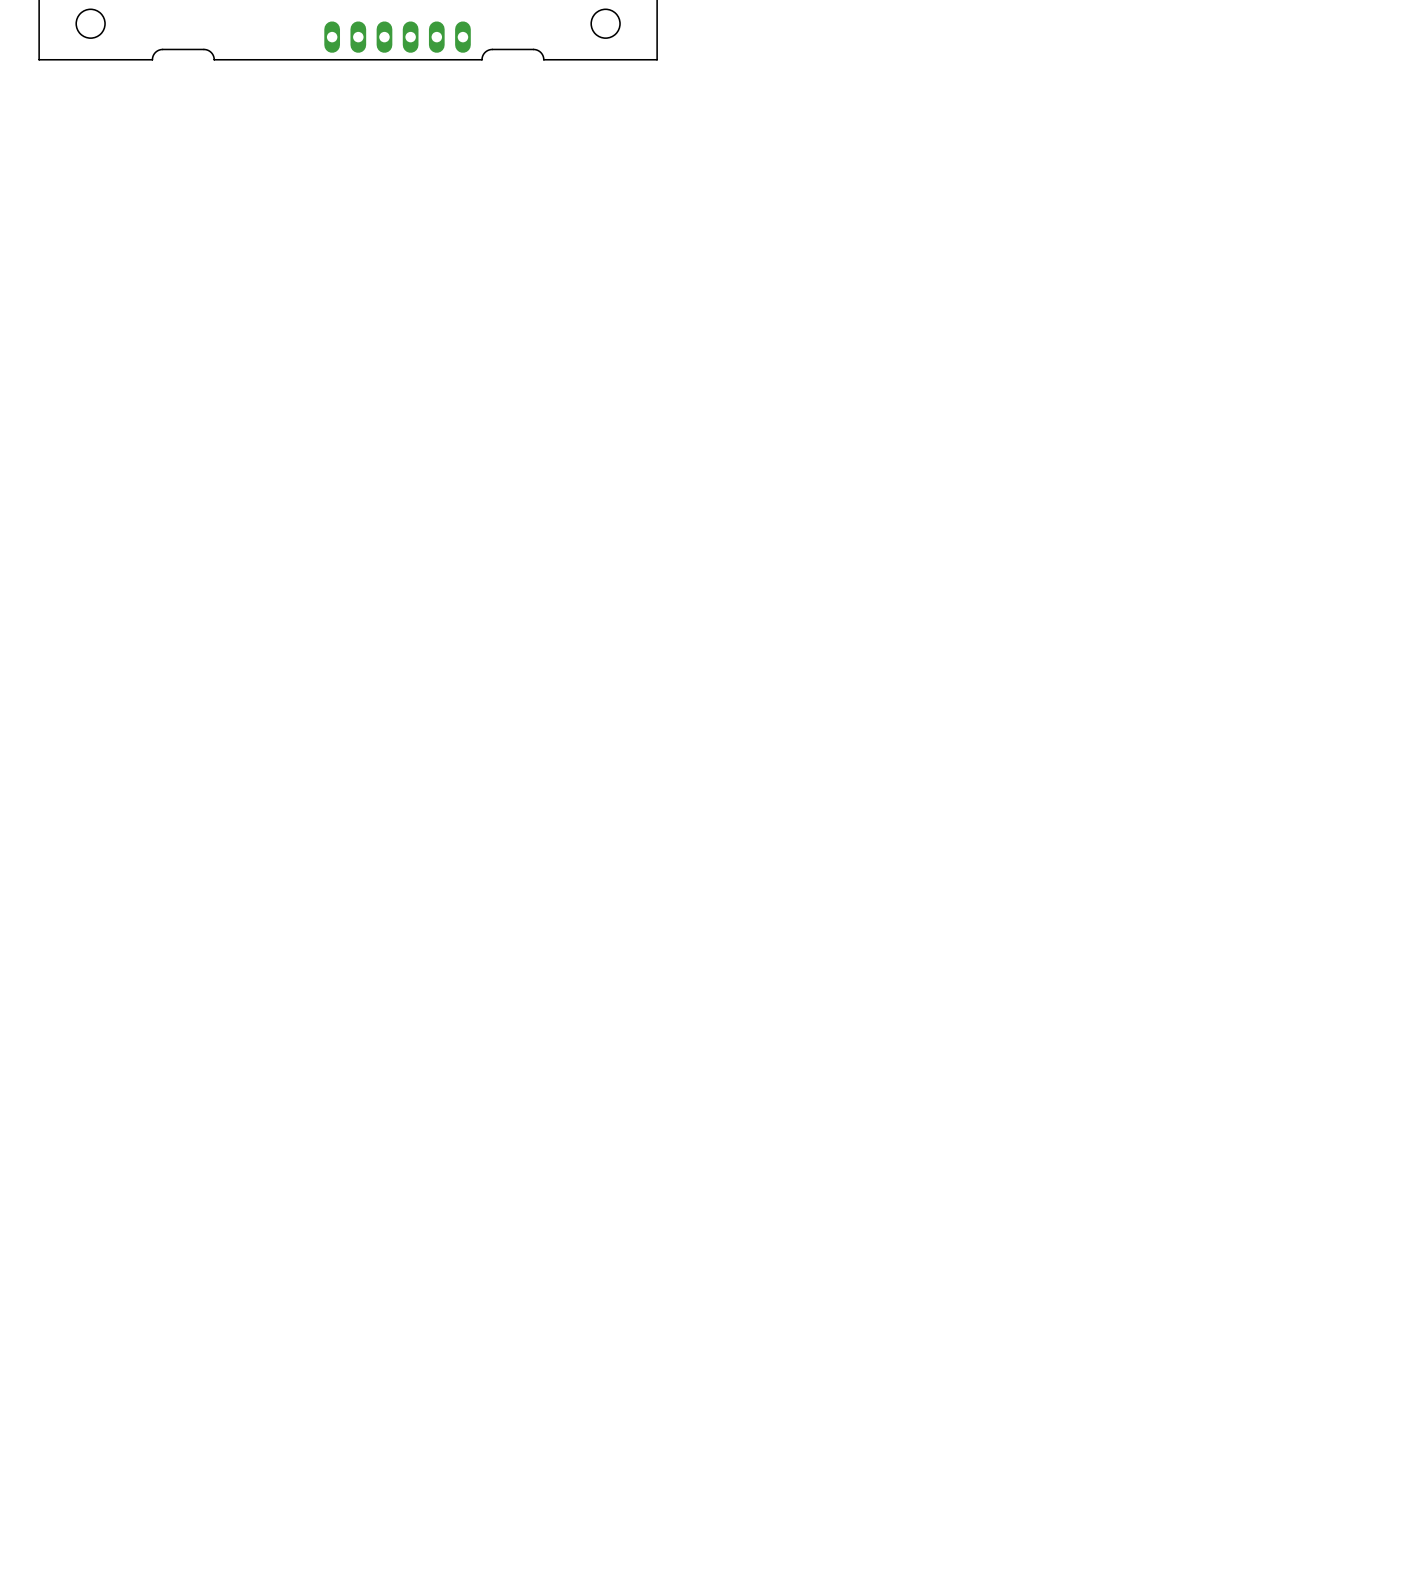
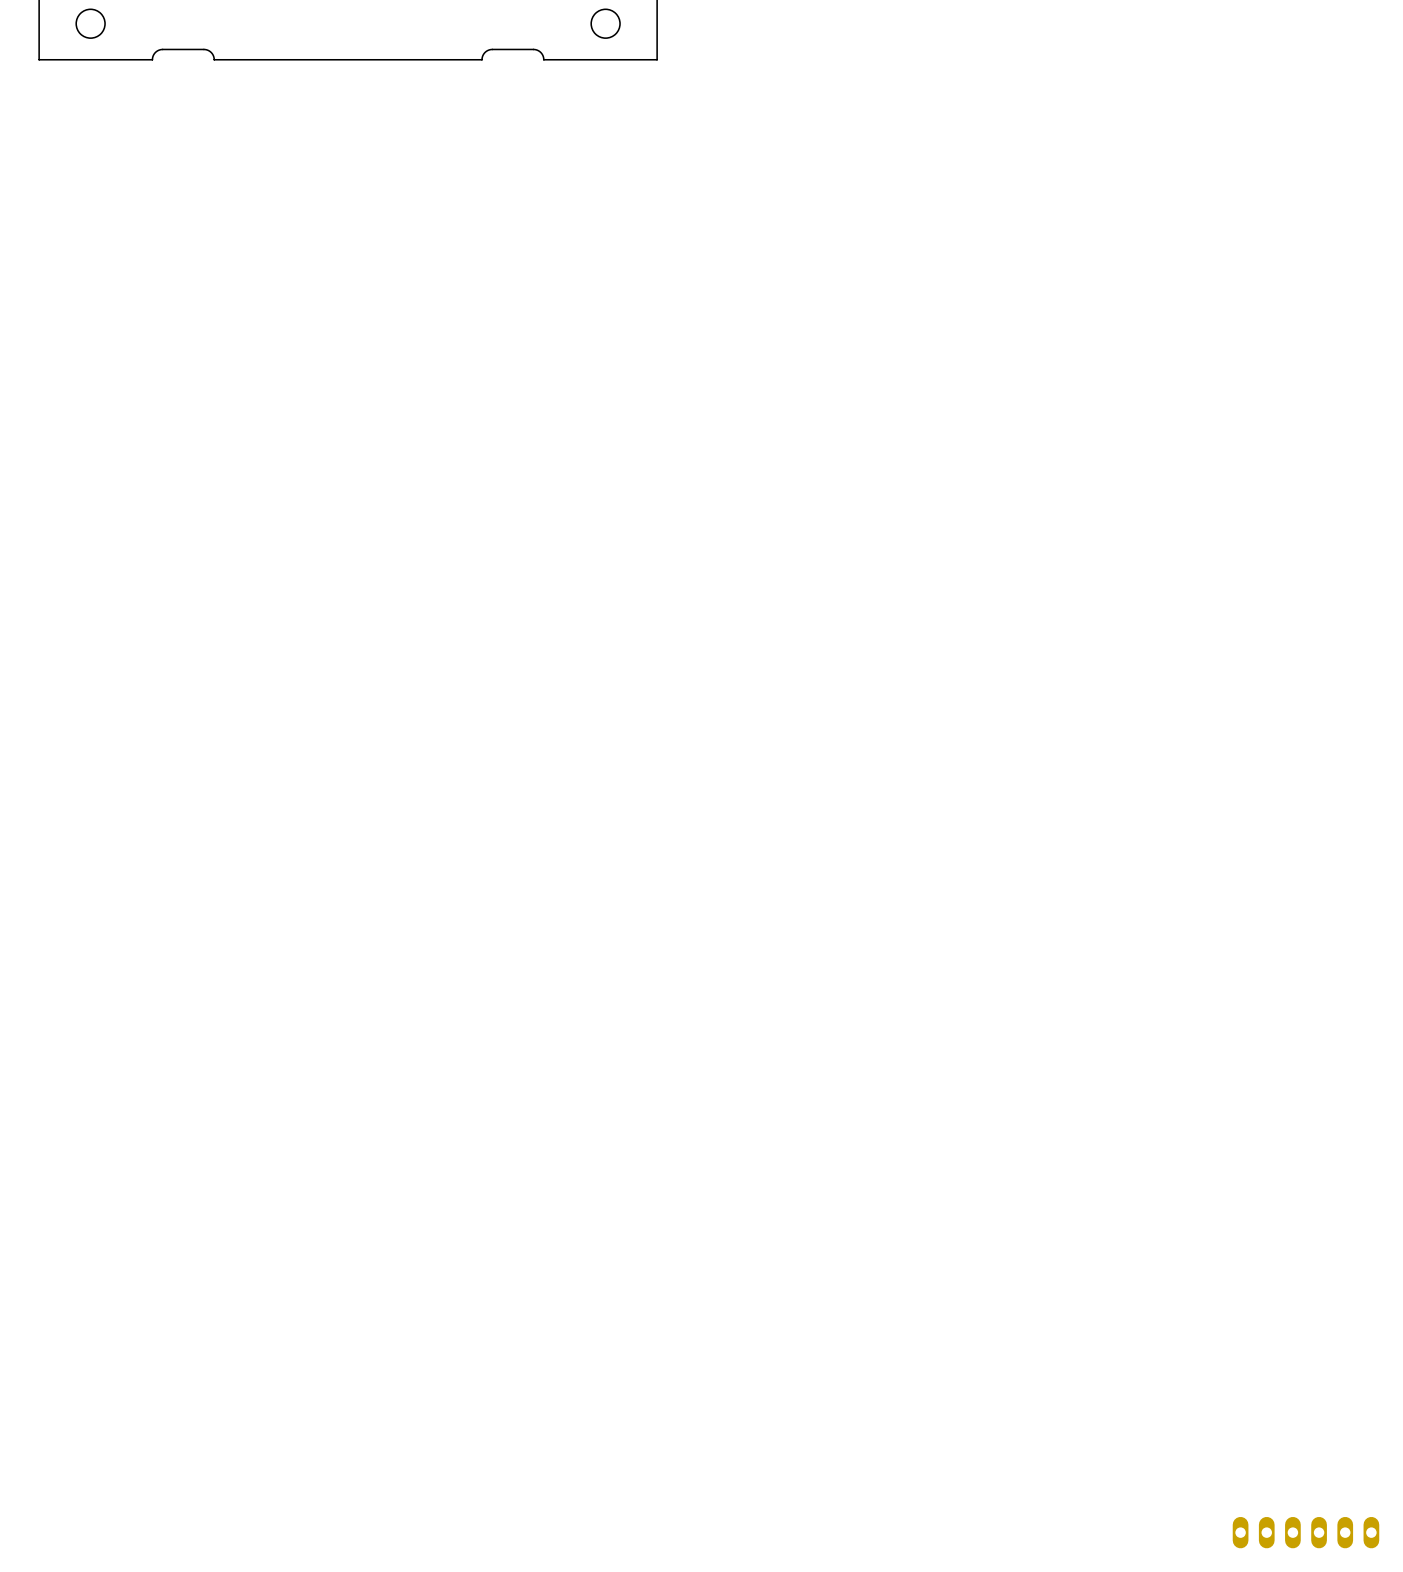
part: (397, 37) -> none
part: none -> (1305, 1532)

